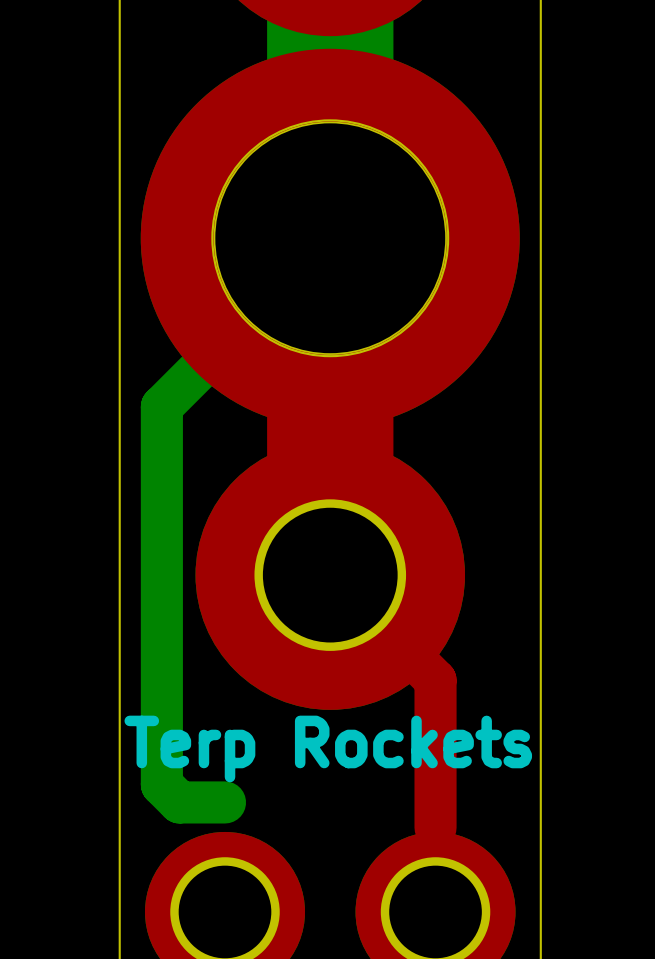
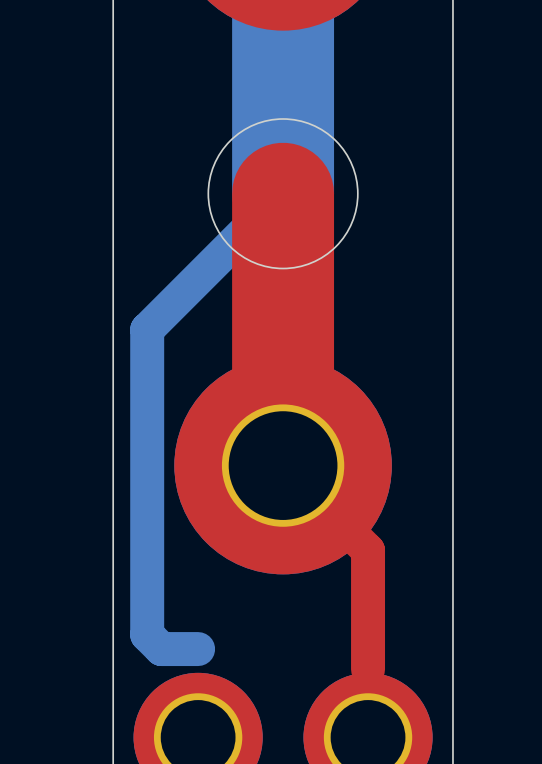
round board edge size: [211, 119, 450, 358] -> [207, 118, 359, 270]
part: (330, 238) -> none
text: Terp Rockets (328, 748) -> none

